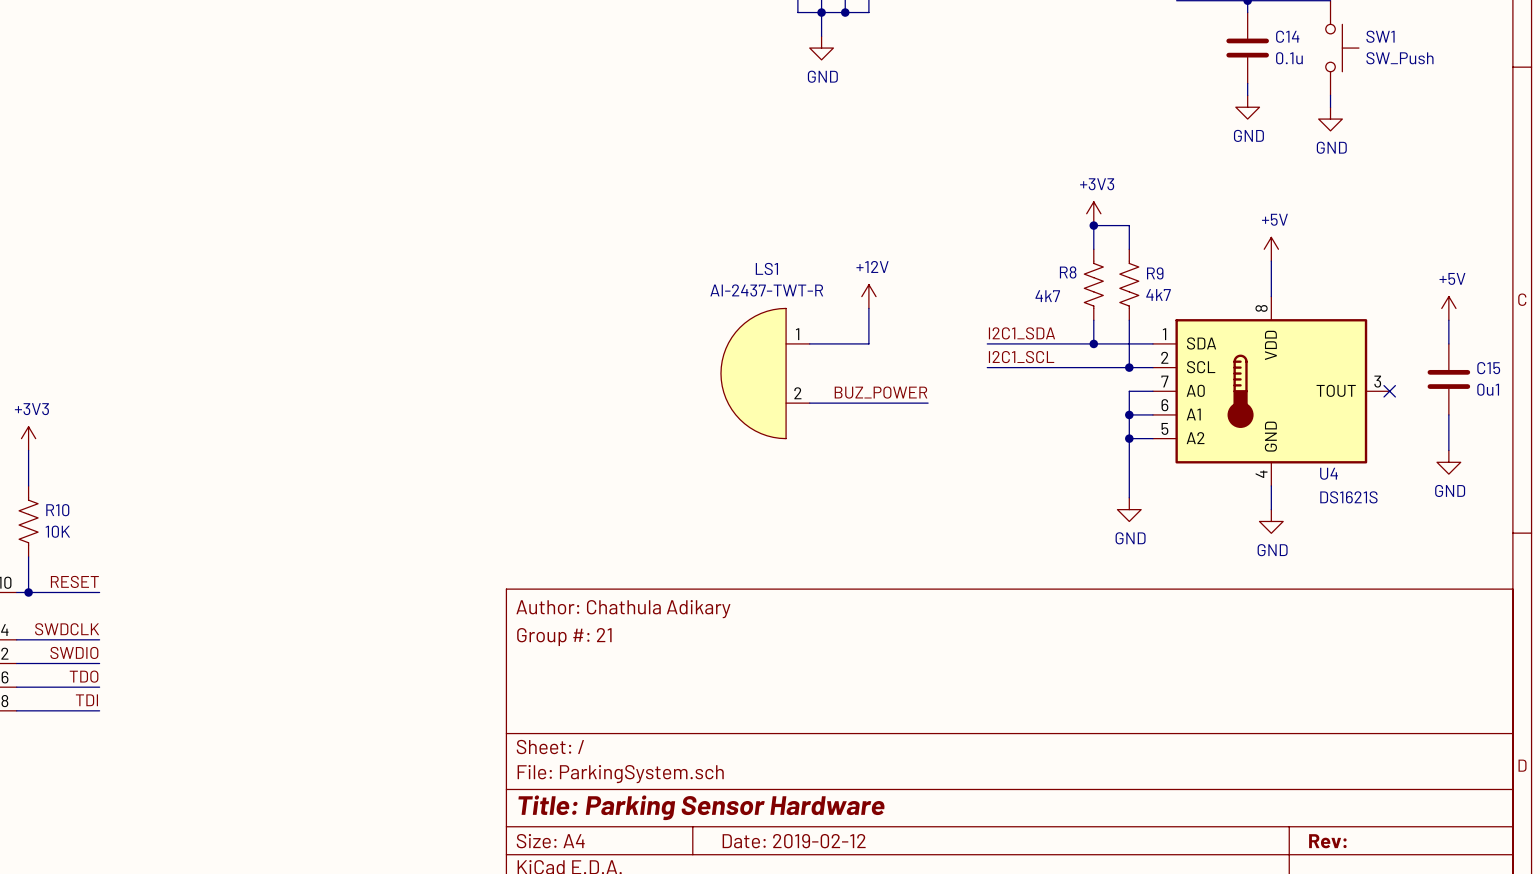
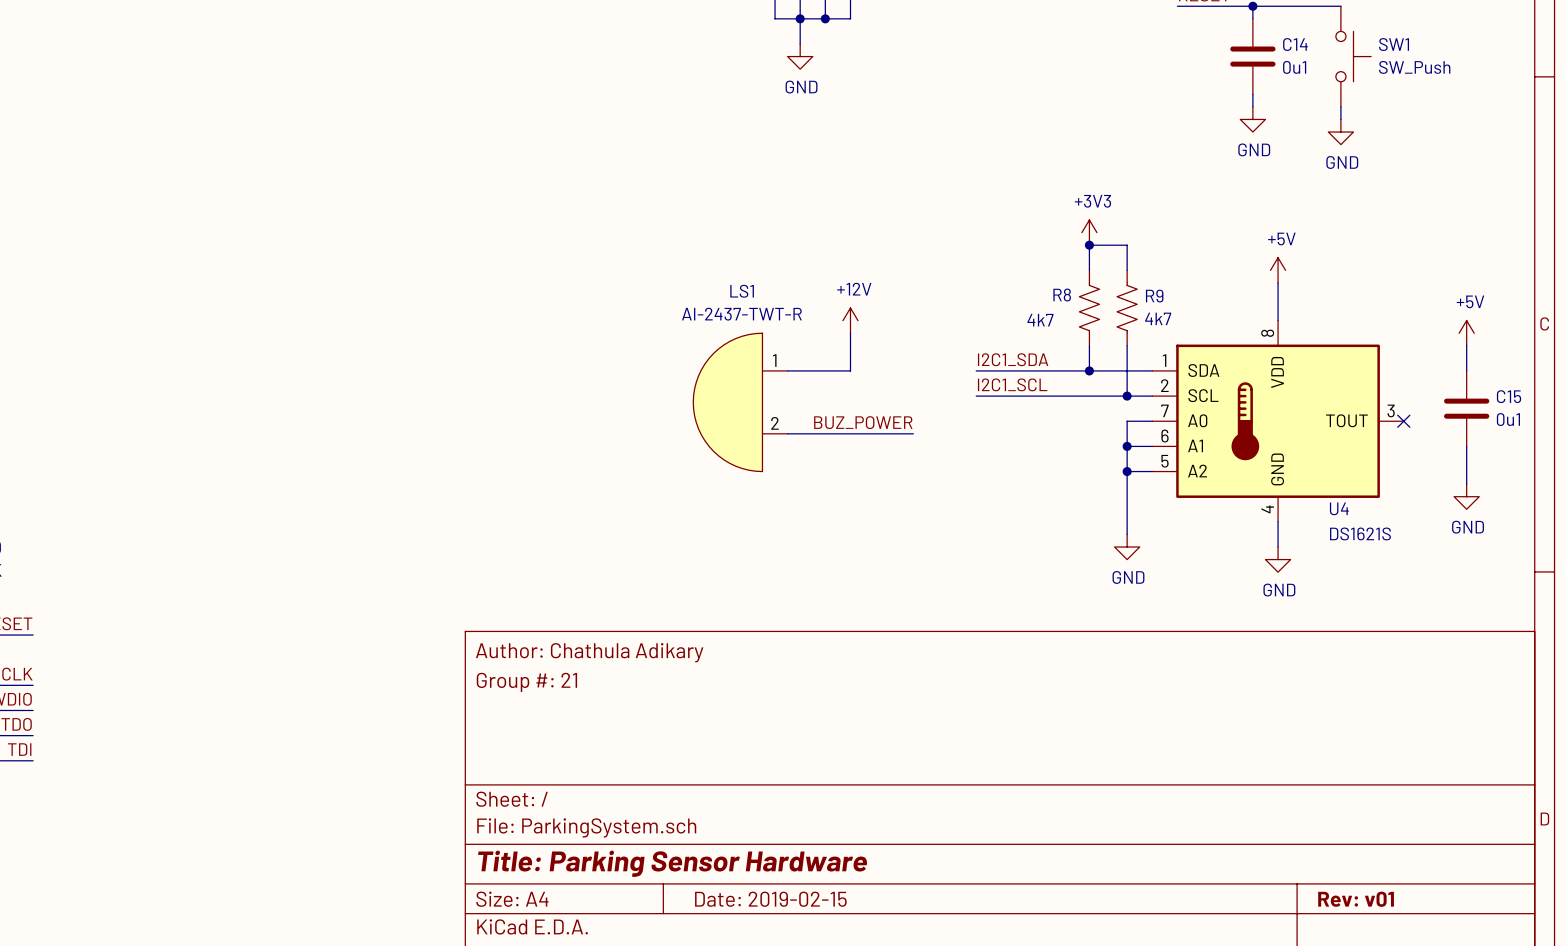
C14 value: 0.1u (1289, 58) -> 0u1 (1294, 67)
title block: Date: 2019-02-12 (794, 841) -> Date: 2019-02-15 (770, 899)
title block: Rev: (1327, 841) -> Rev: v01 (1356, 899)

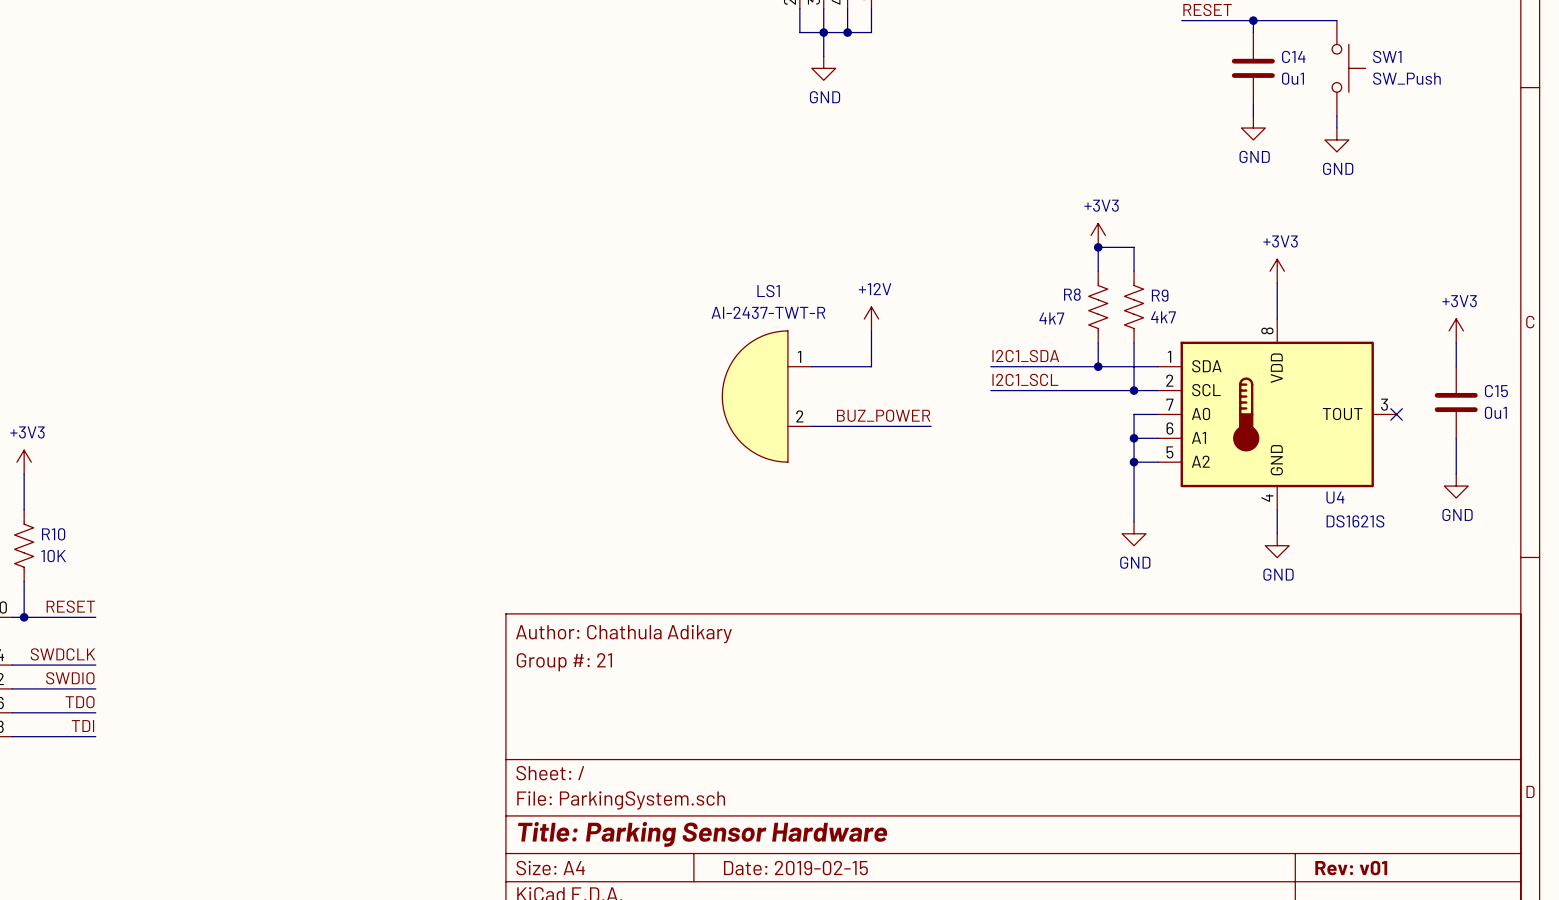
power symbol: +5V (1278, 270) -> +3V3 (1277, 271)
power symbol: +5V (1466, 333) -> +3V3 (1456, 330)

